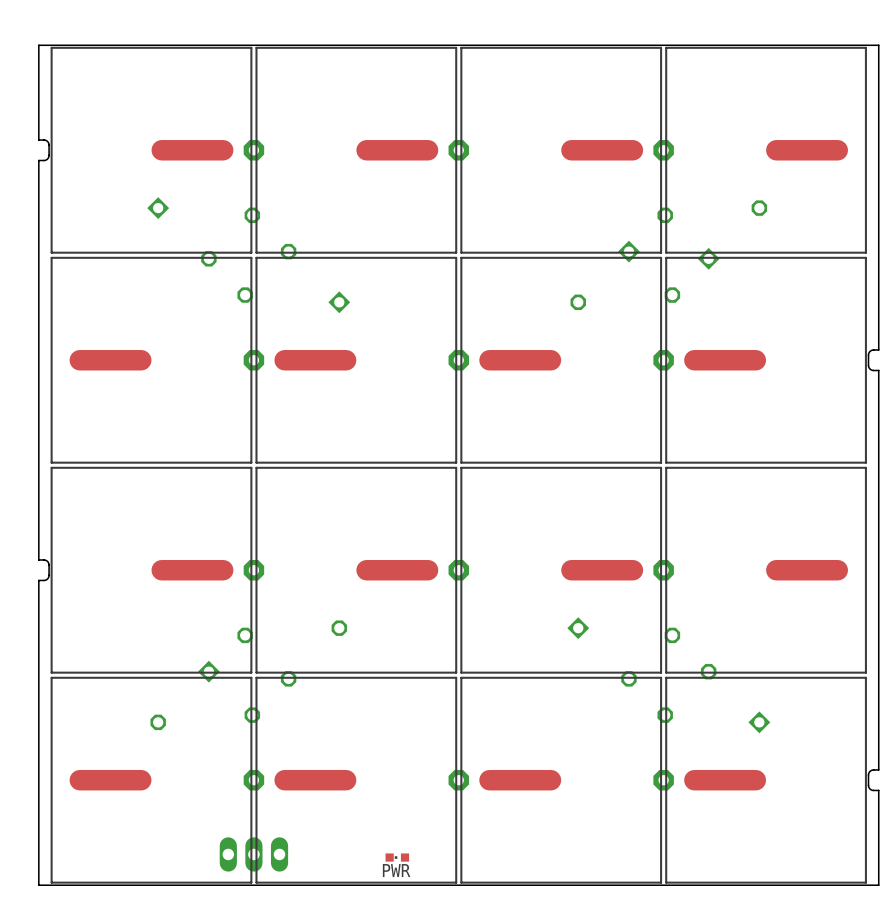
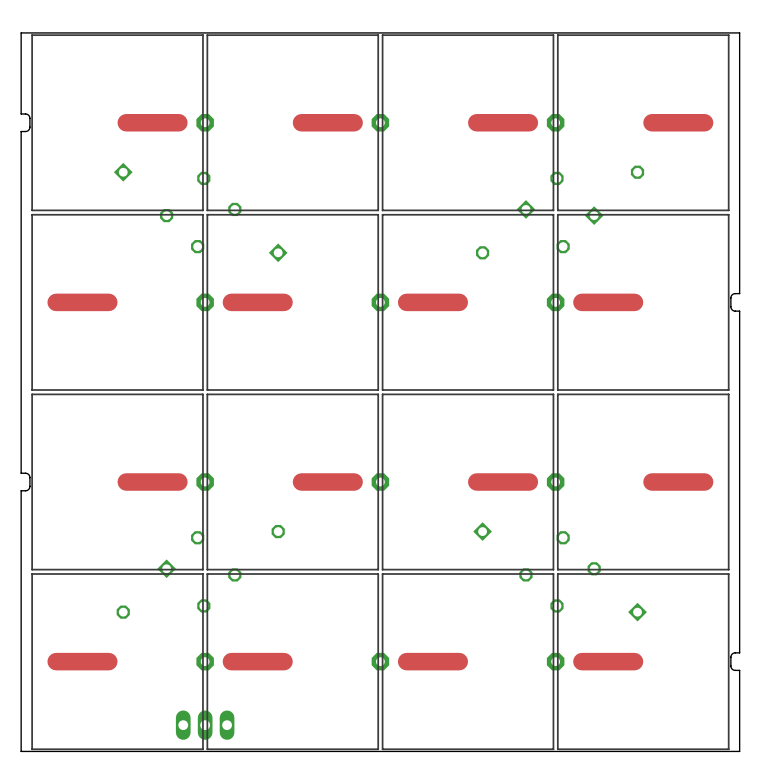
PWR: (397, 857) -> none

